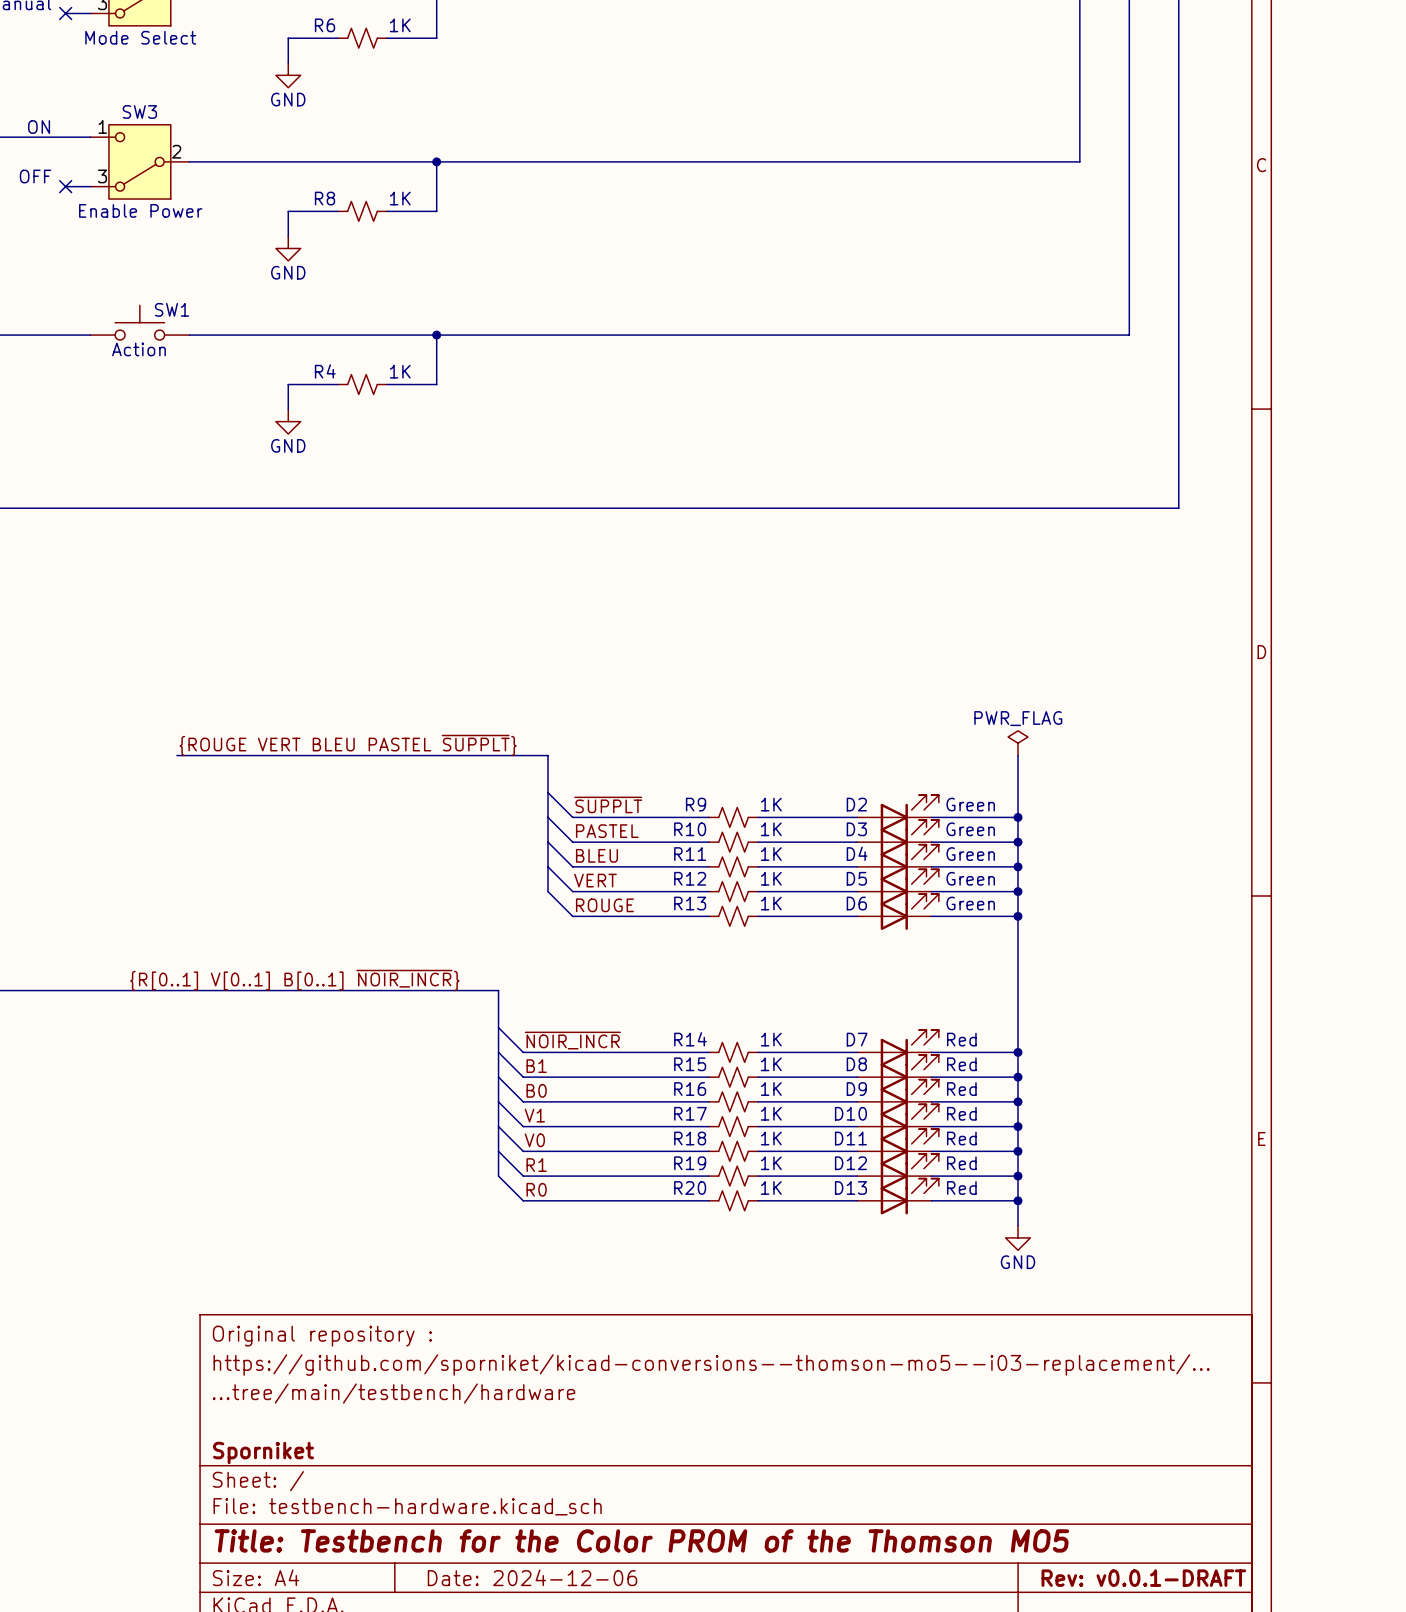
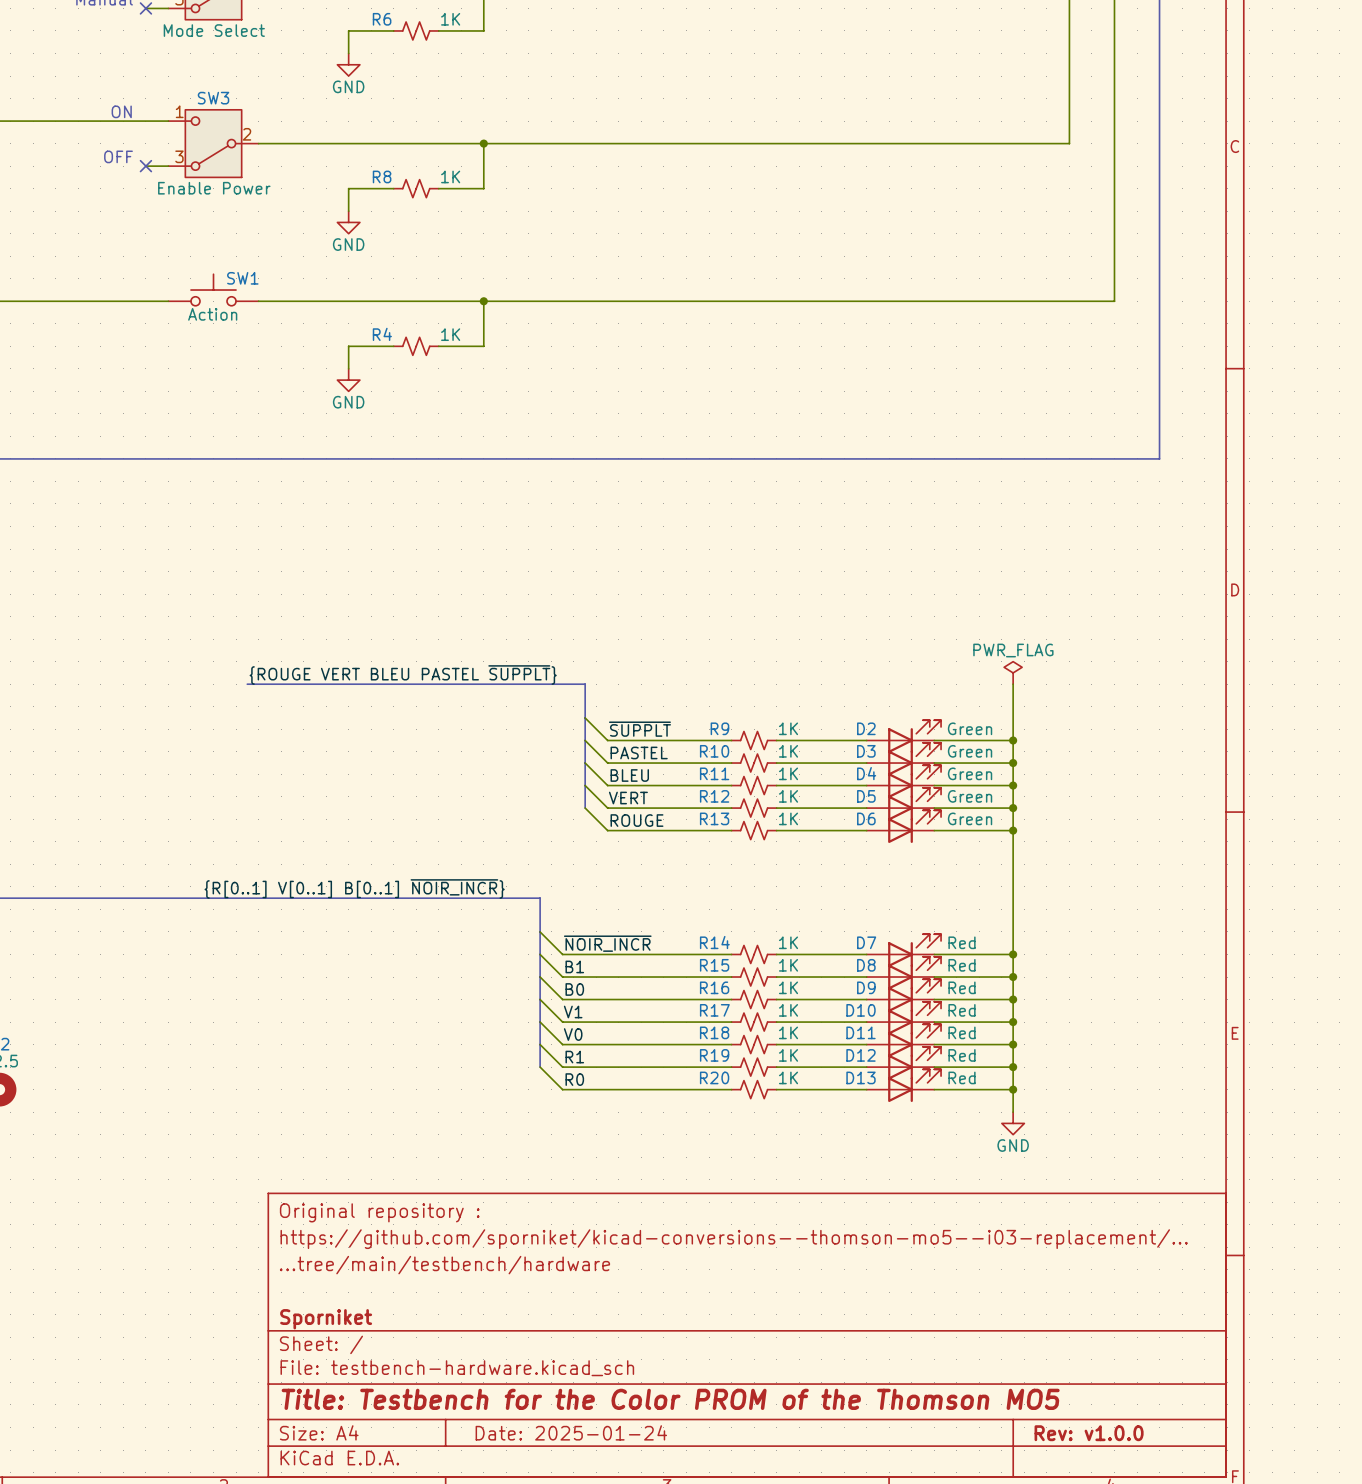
title block: Date: 2024-12-06 (532, 1577) -> Date: 2025-01-24 (571, 1432)
title block: Rev: v0.0.1-DRAFT (1143, 1578) -> Rev: v1.0.0 (1089, 1433)

